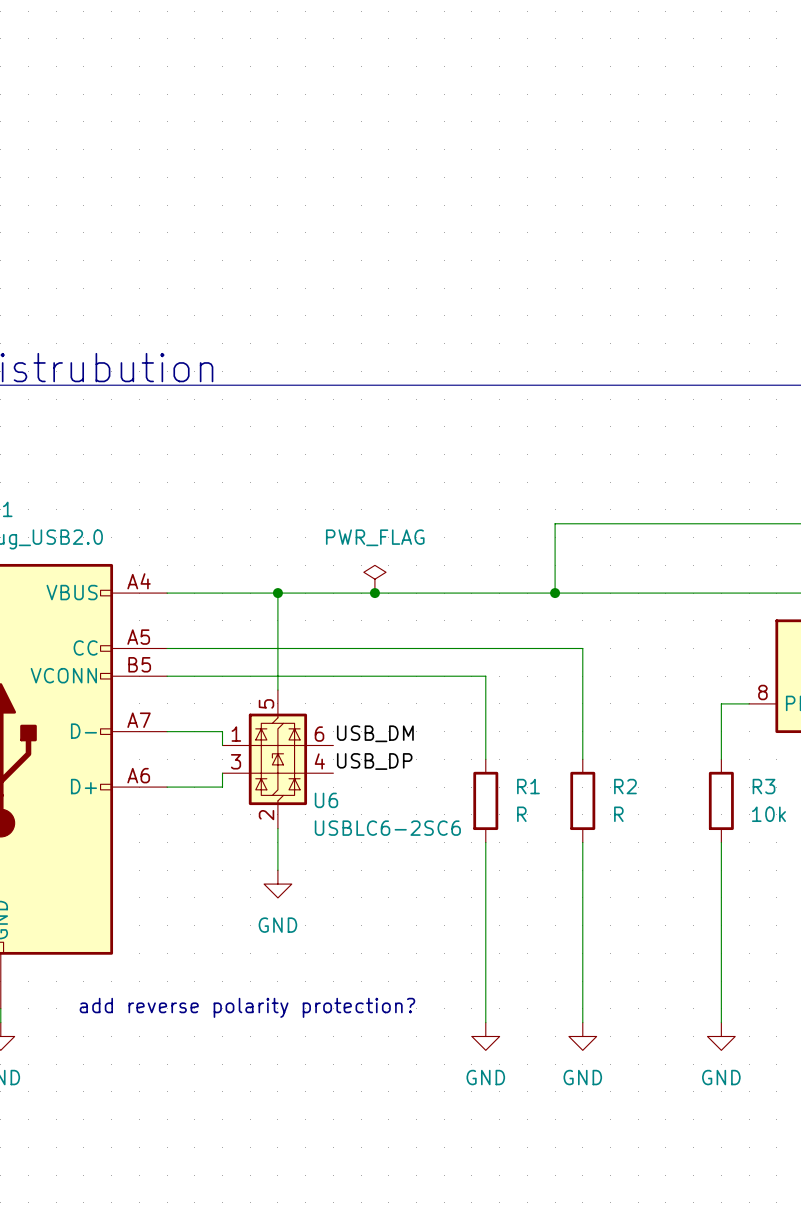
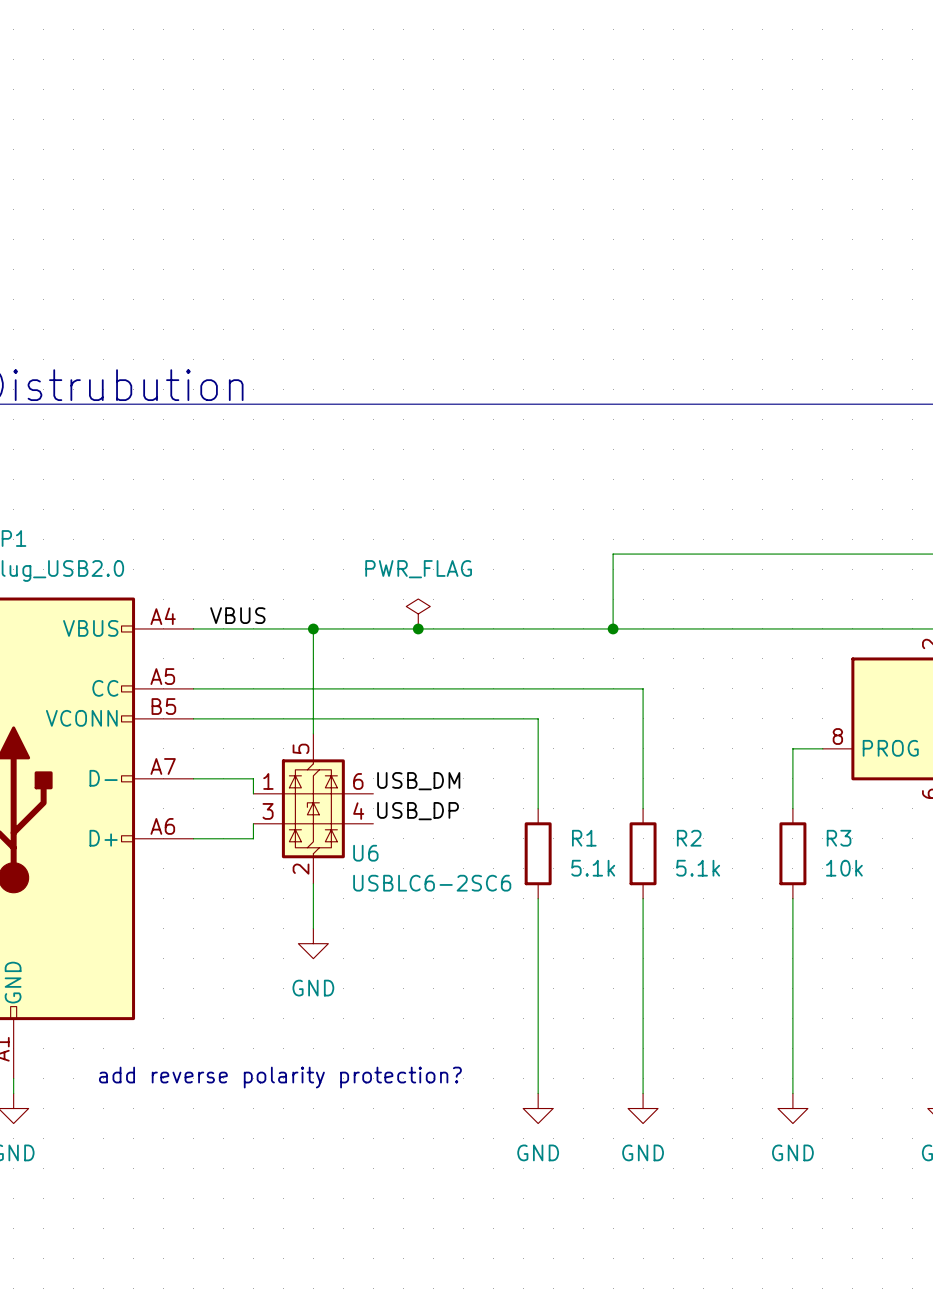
label: none -> VBUS (237, 615)
R1 value: R (521, 814) -> 5.1k (593, 868)
R2 value: R (618, 814) -> 5.1k (698, 868)

